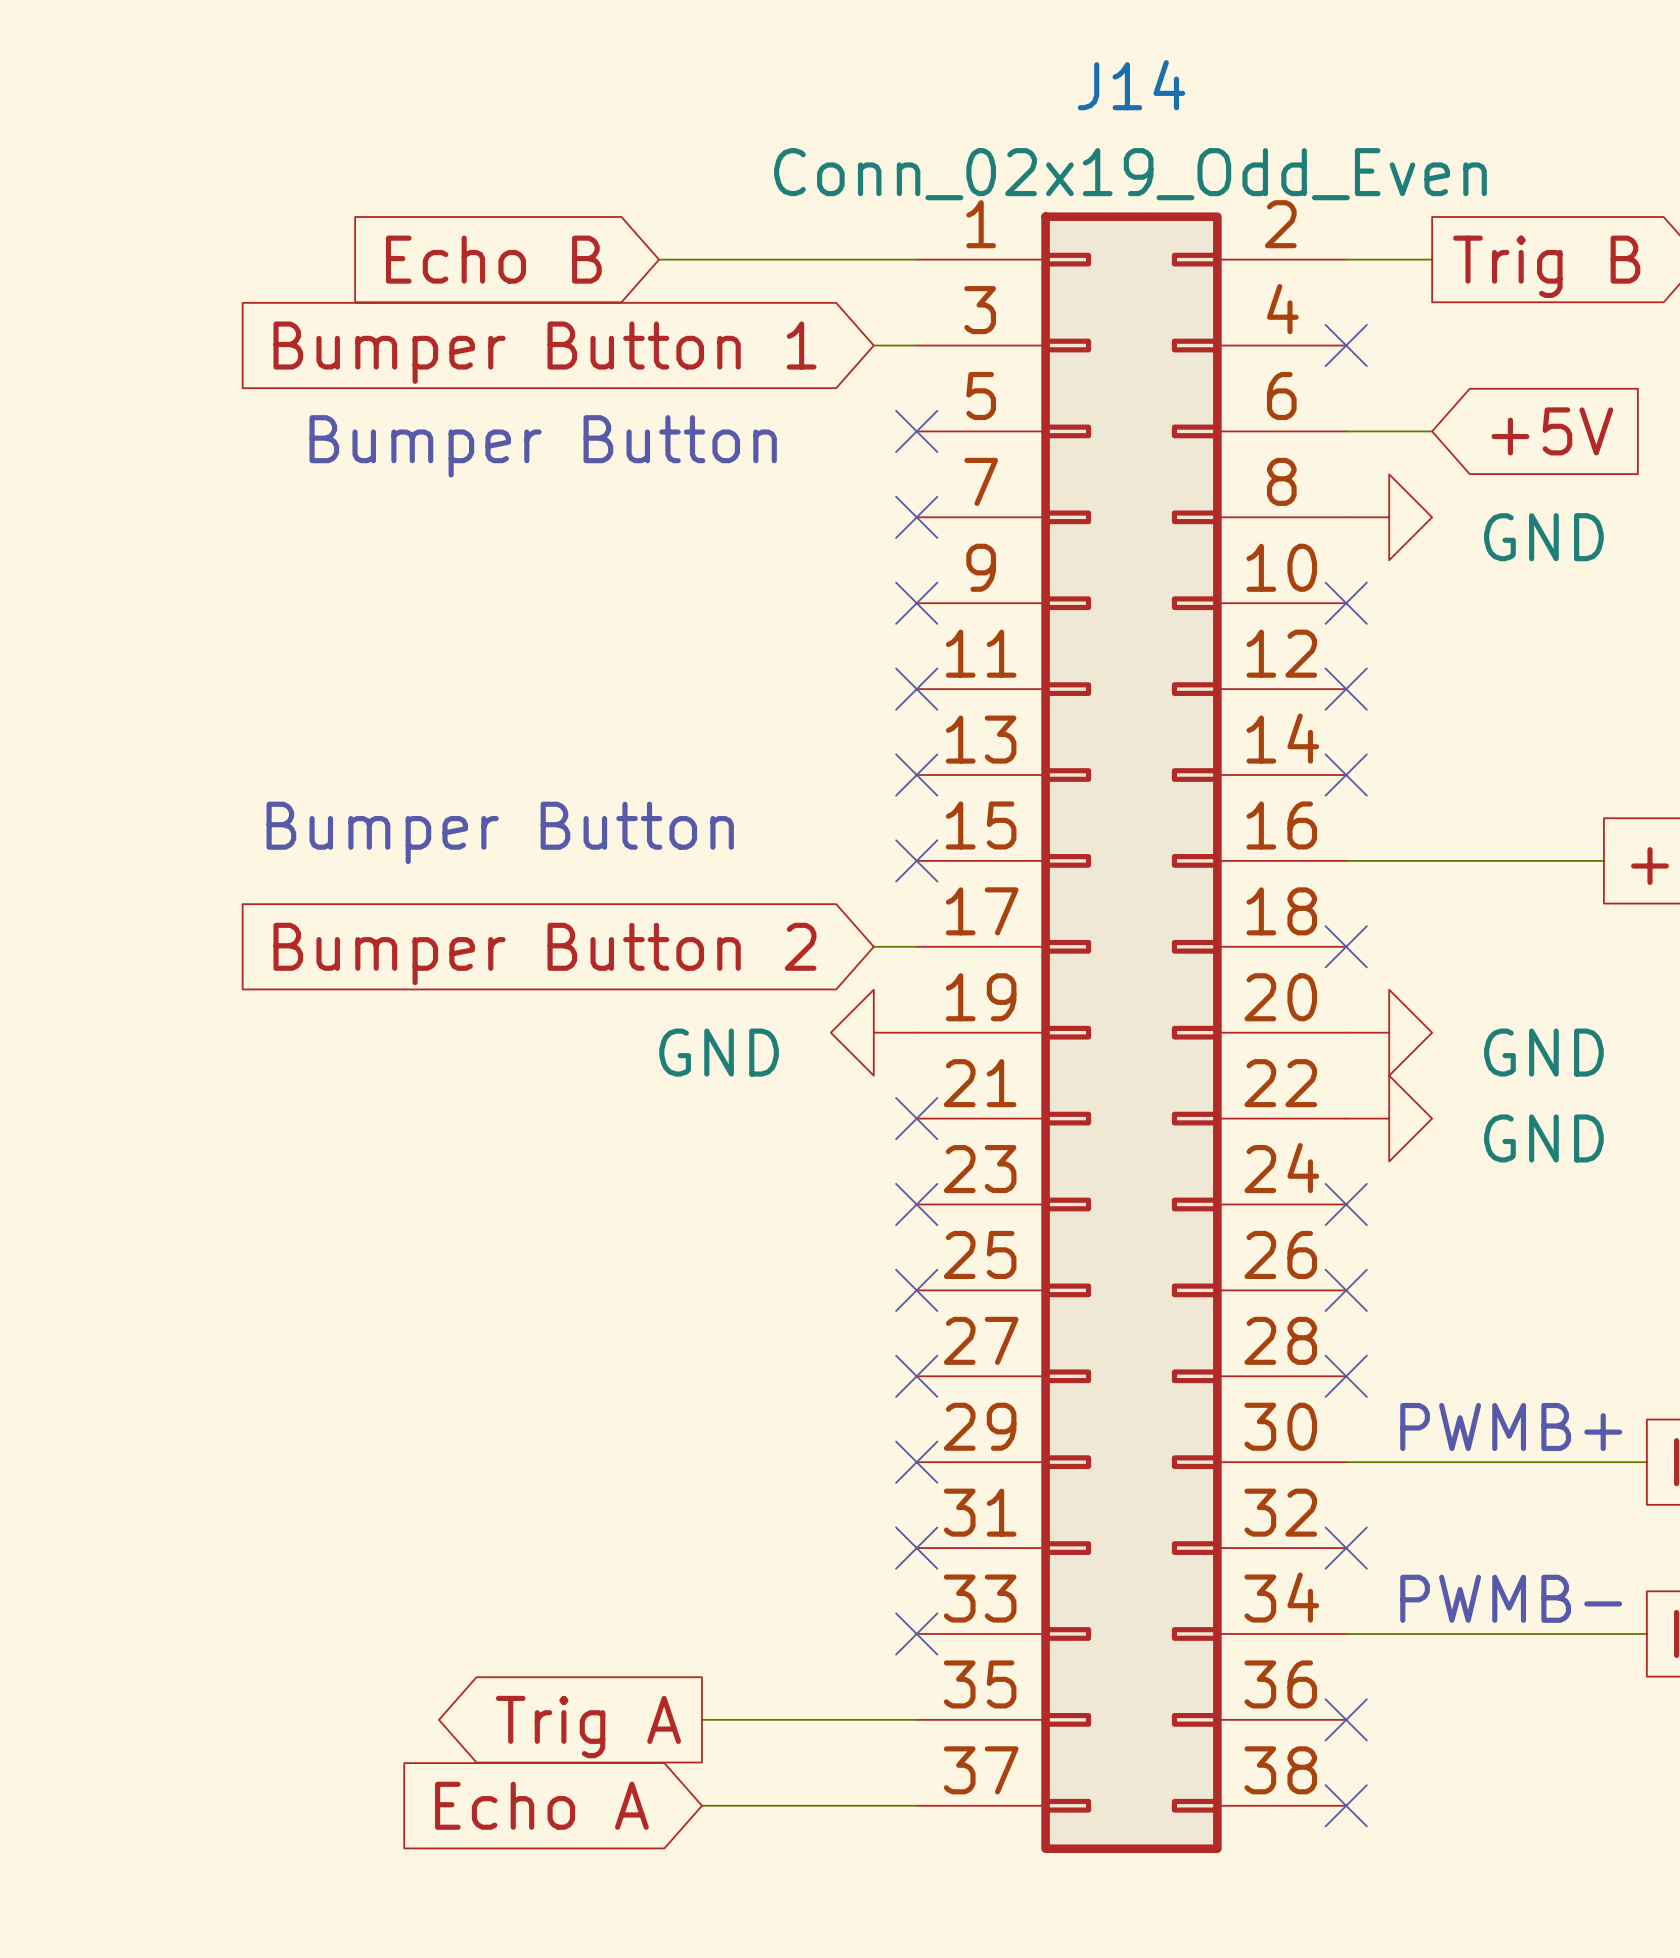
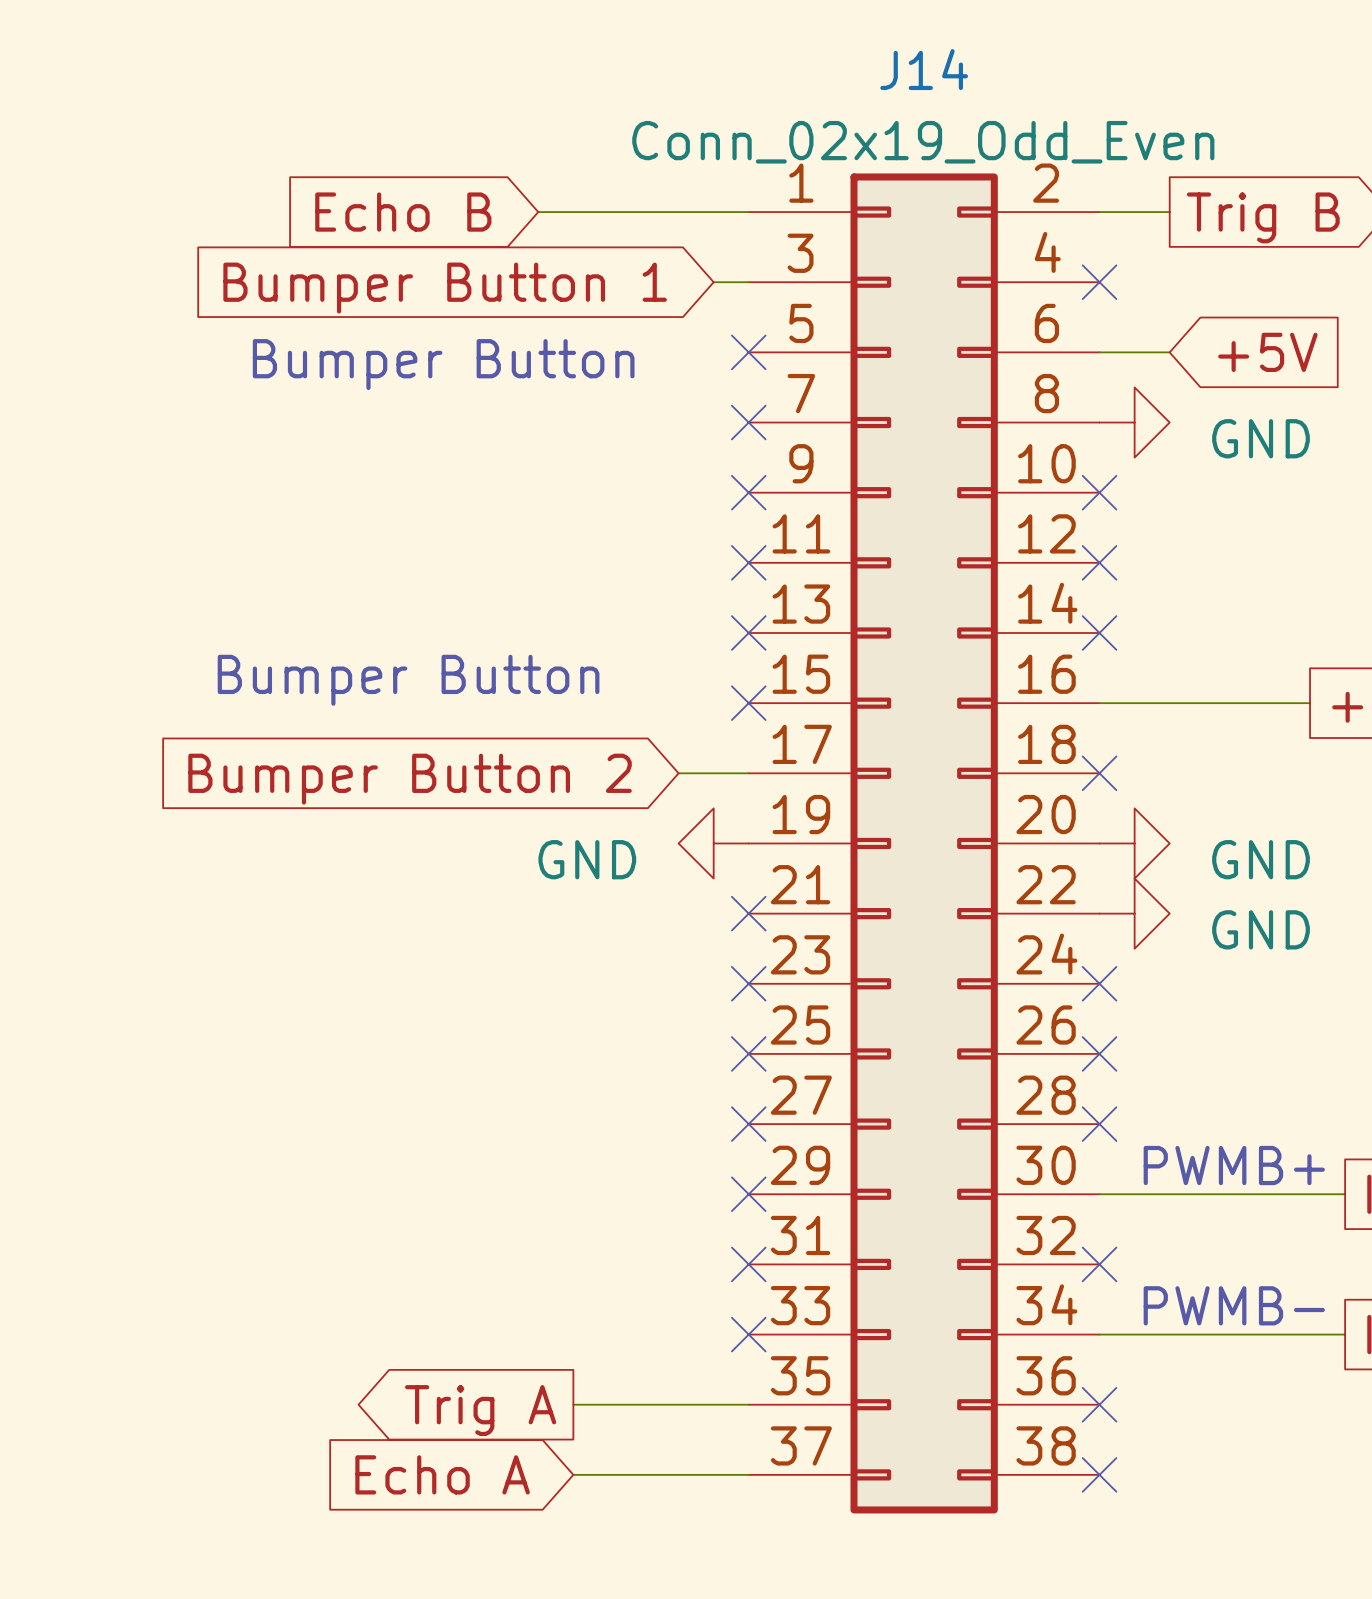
wire: none -> (678, 773) (713, 773)
global label position: Bumper Button 2 (544, 953) -> Bumper Button 2 (410, 779)

